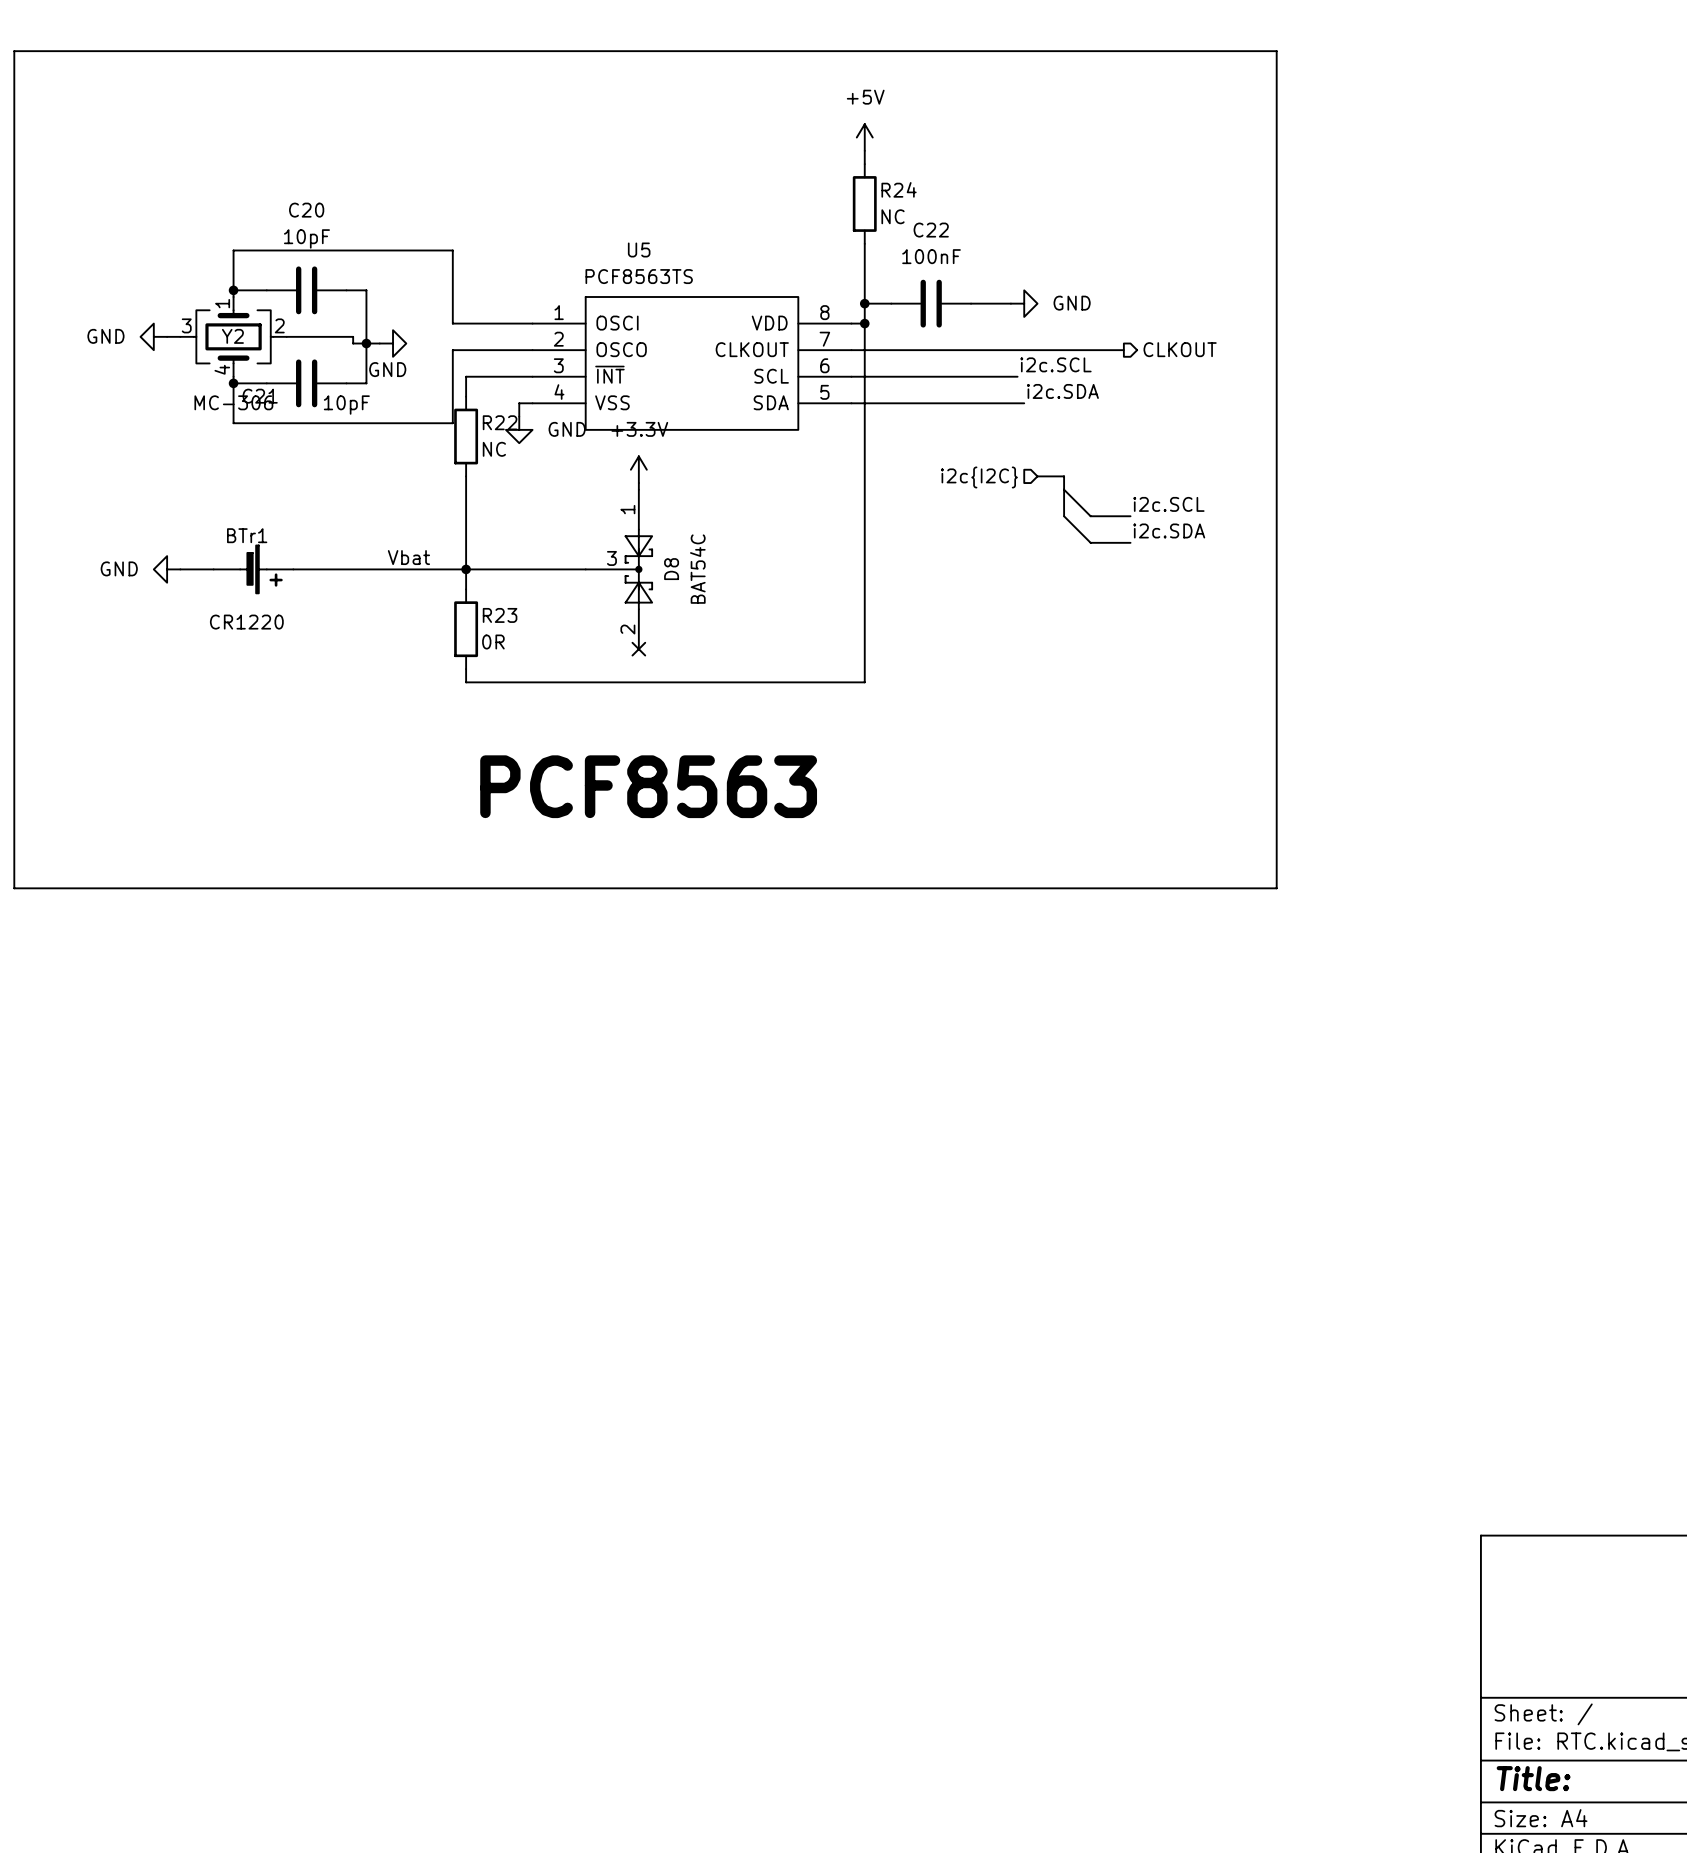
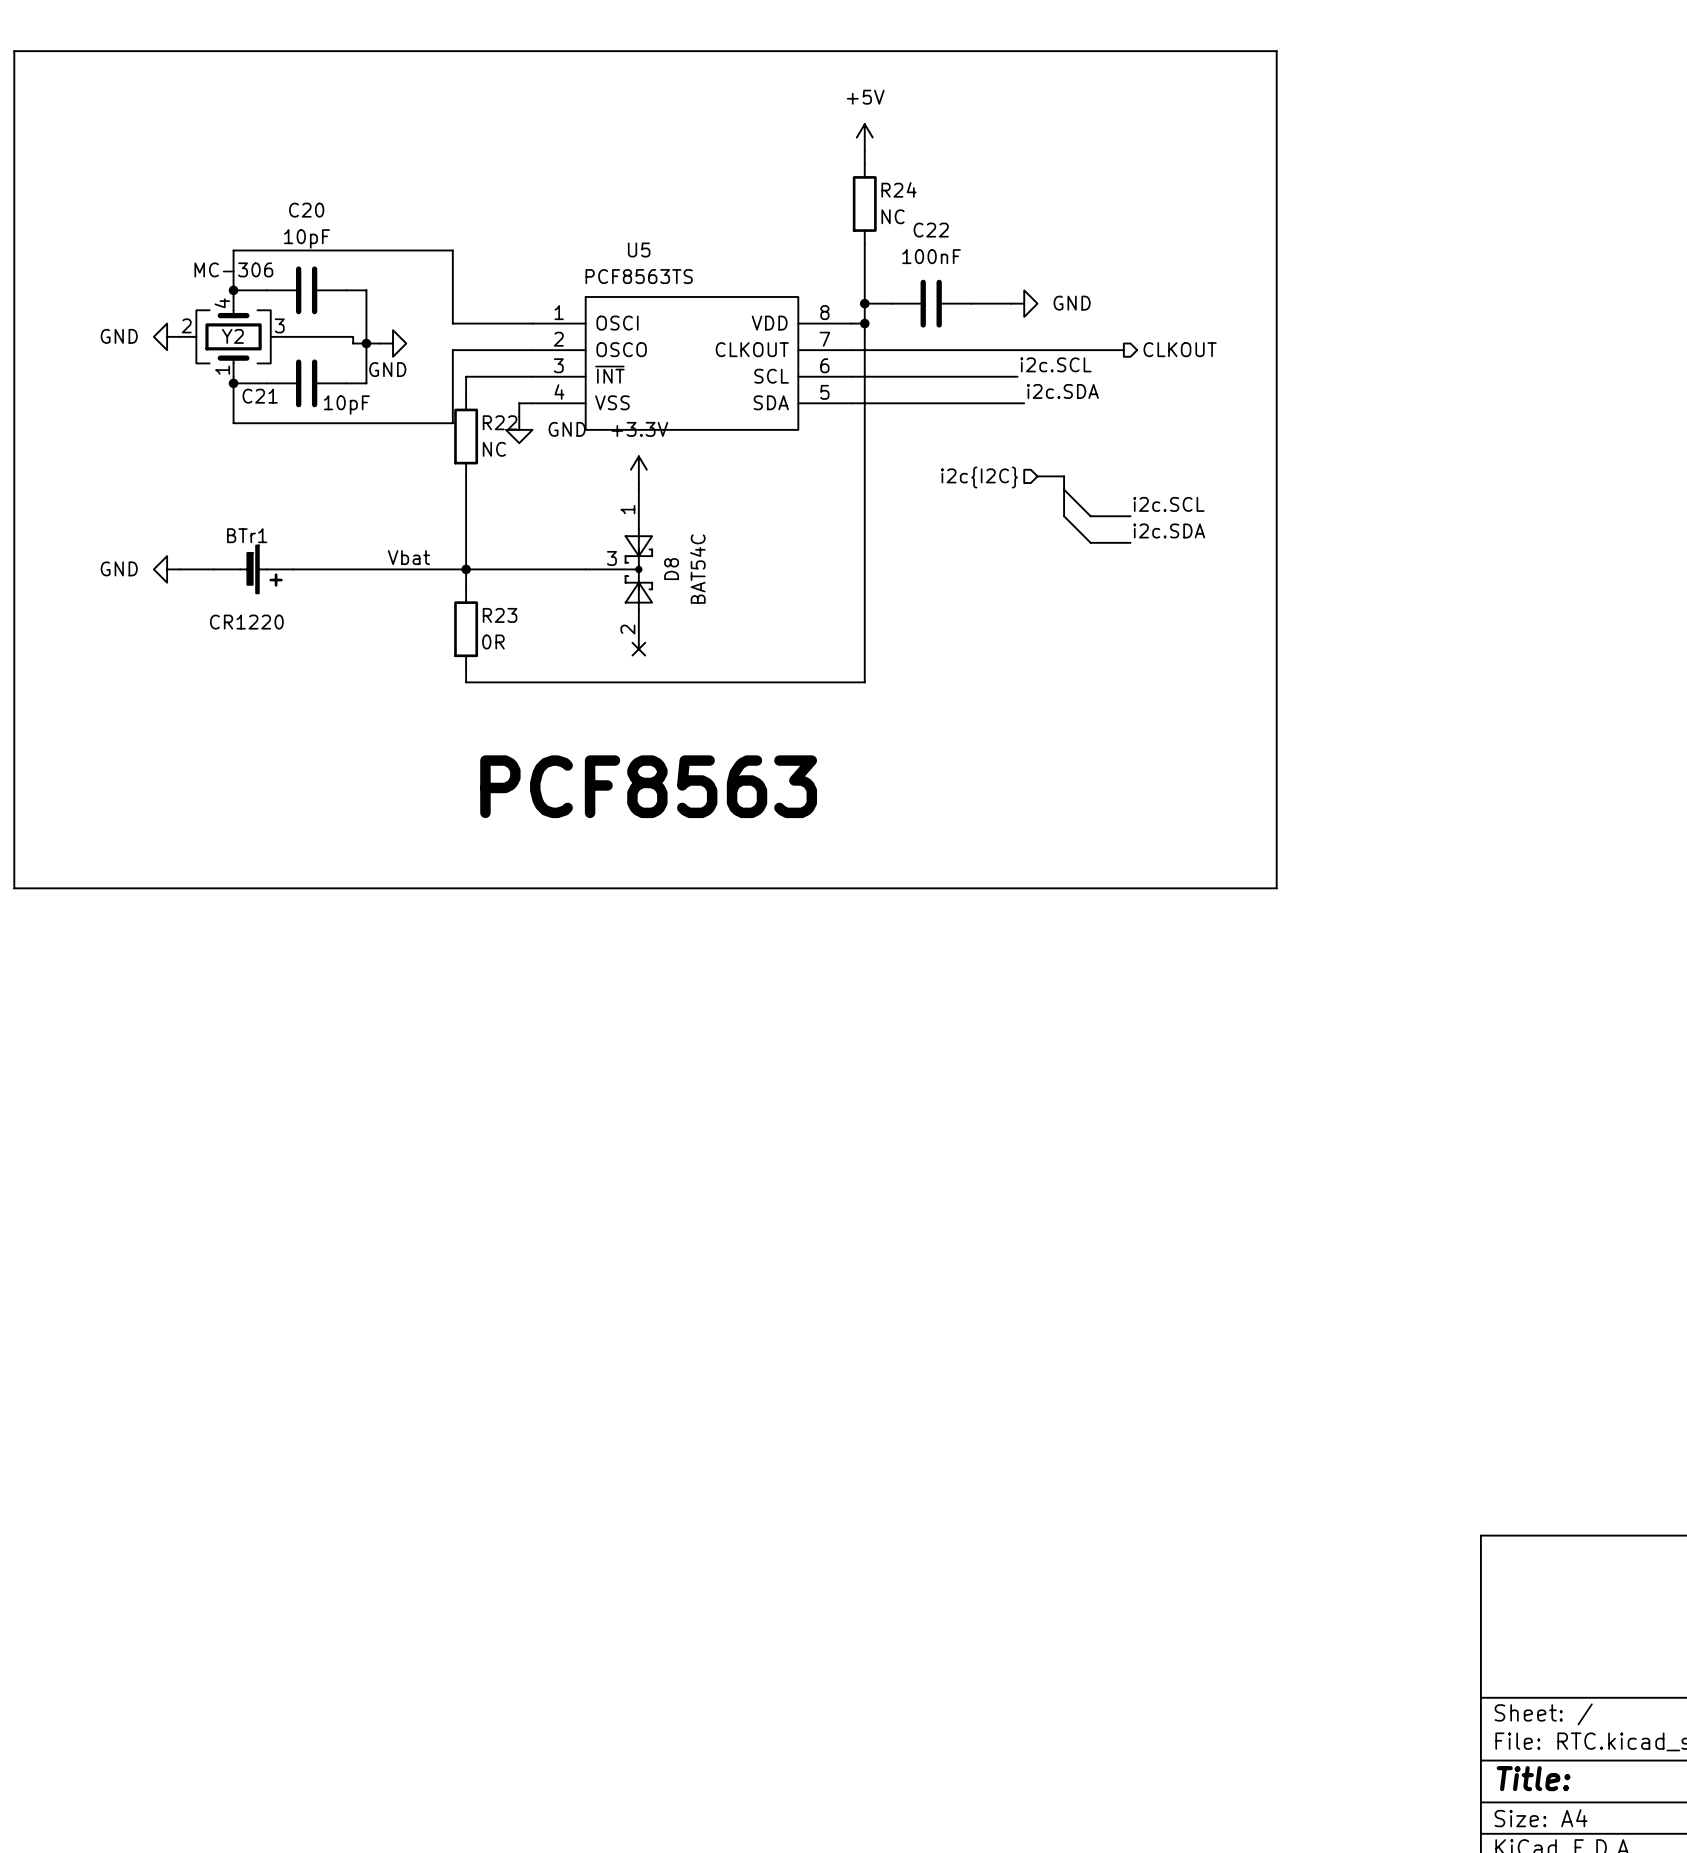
power symbol position: GND (153, 336) -> GND (167, 336)
Y2 rotation: 0° (233, 336) -> 180° (233, 336)

